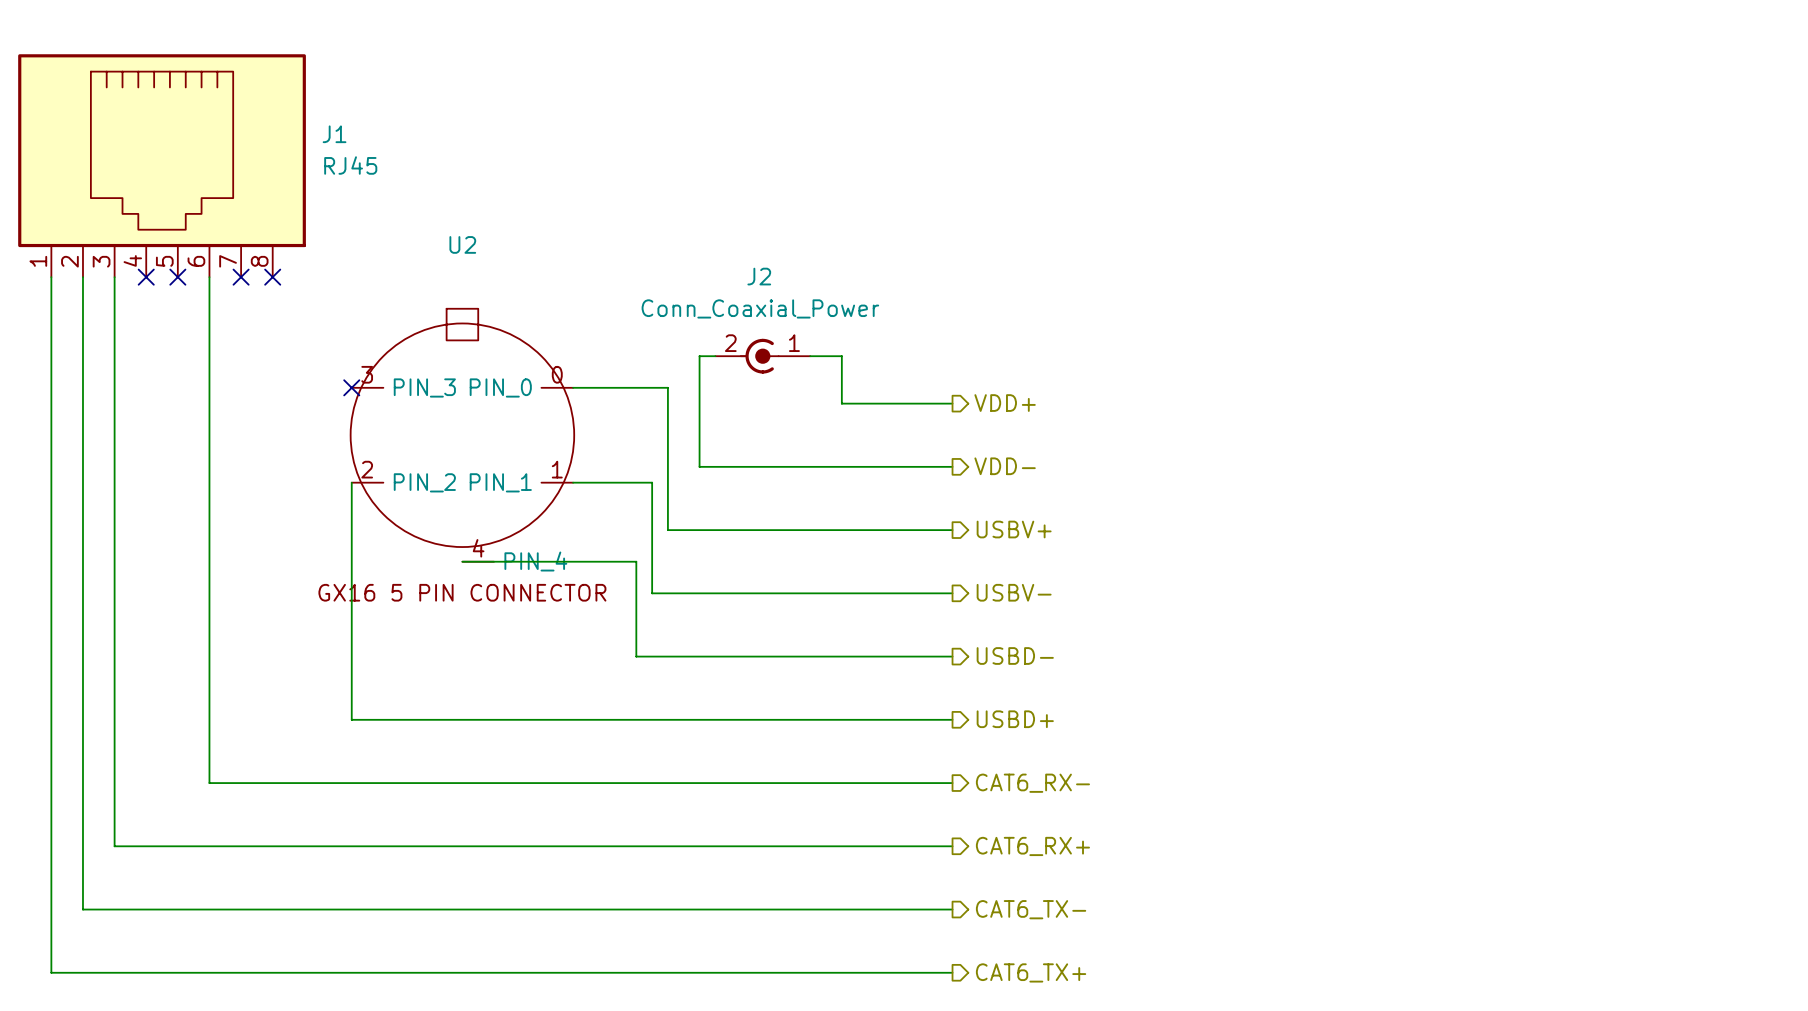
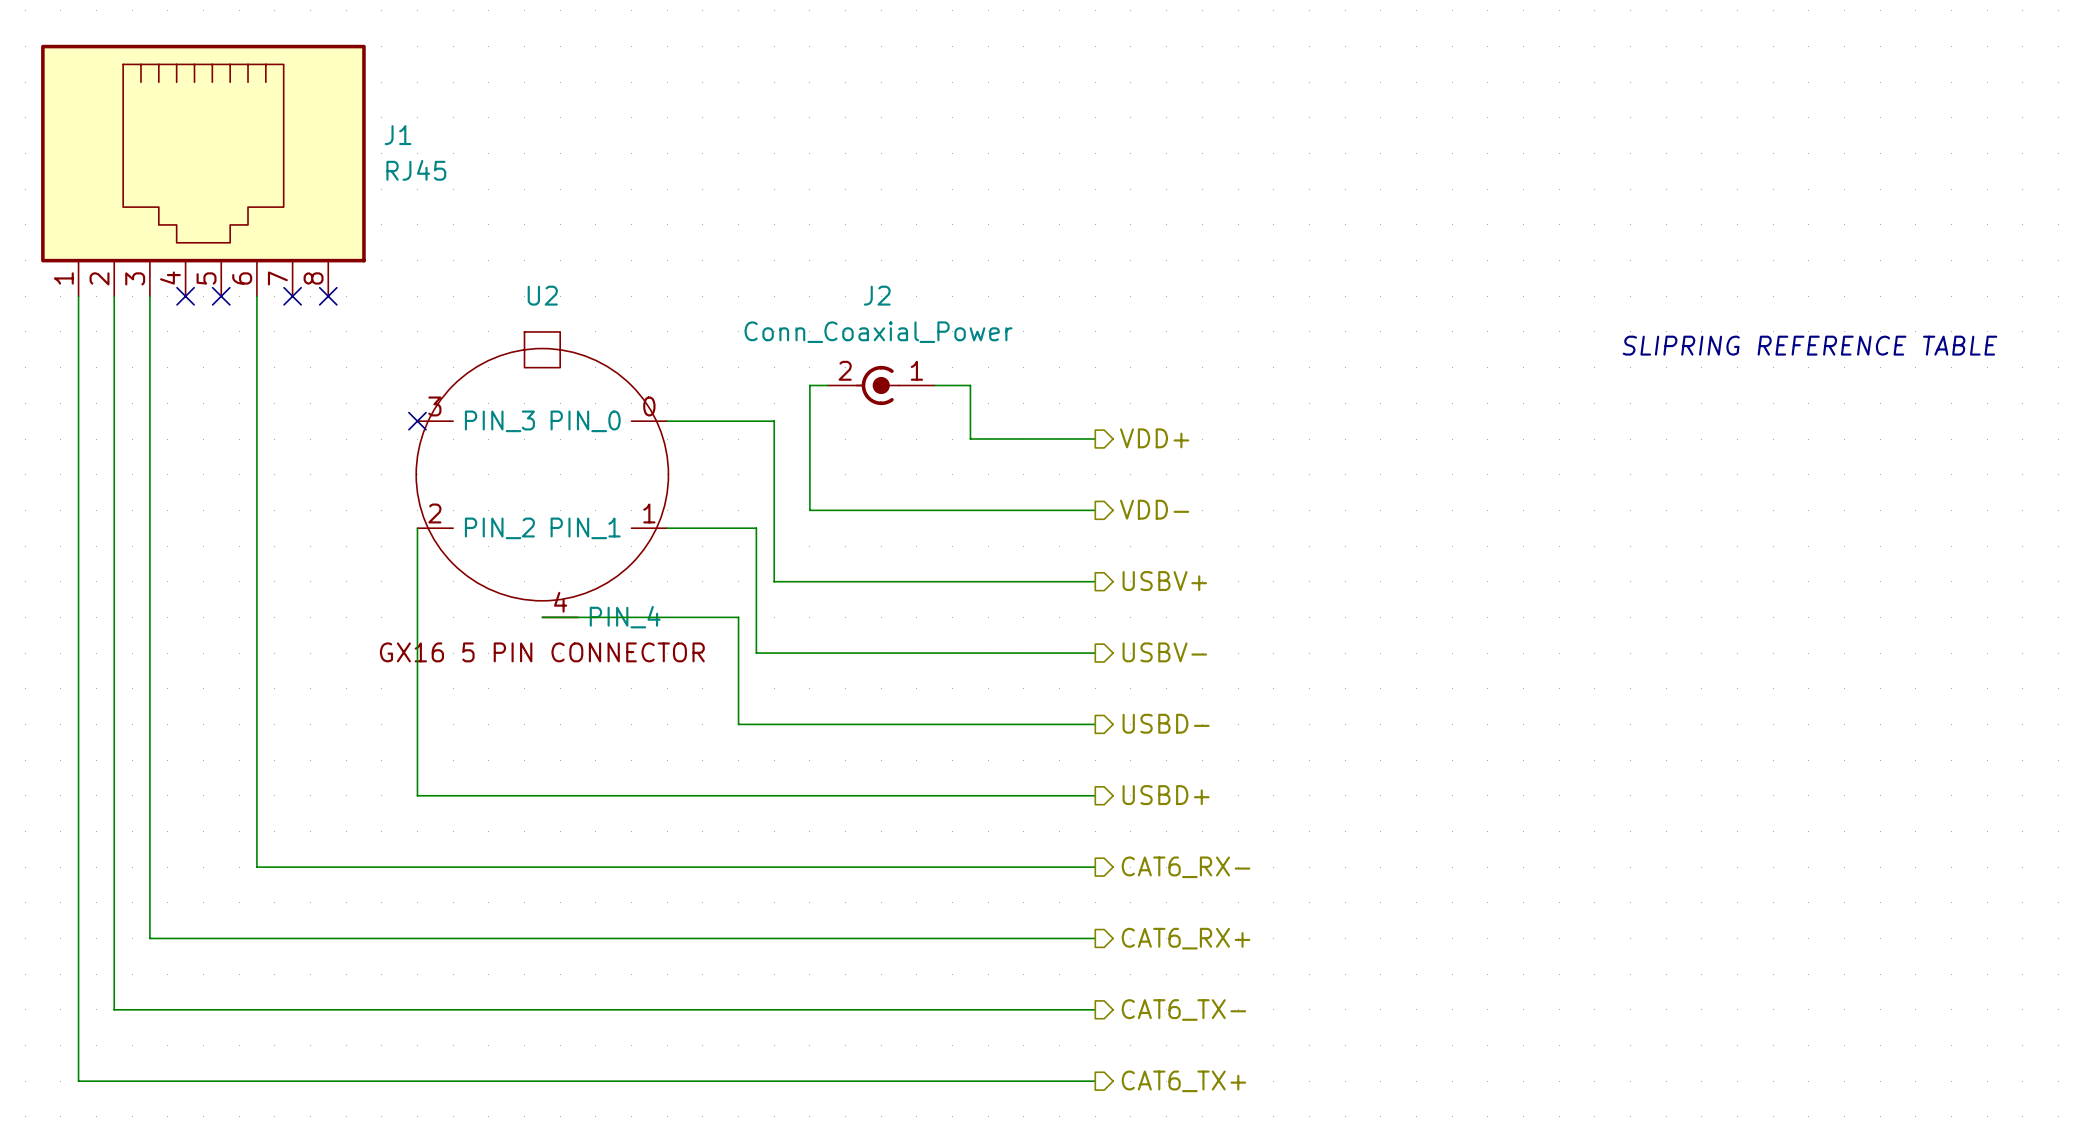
U2 name position: U2 (462, 244) -> U2 (542, 295)
text: none -> SLIPRING REFERENCE TABLE (1809, 345)

